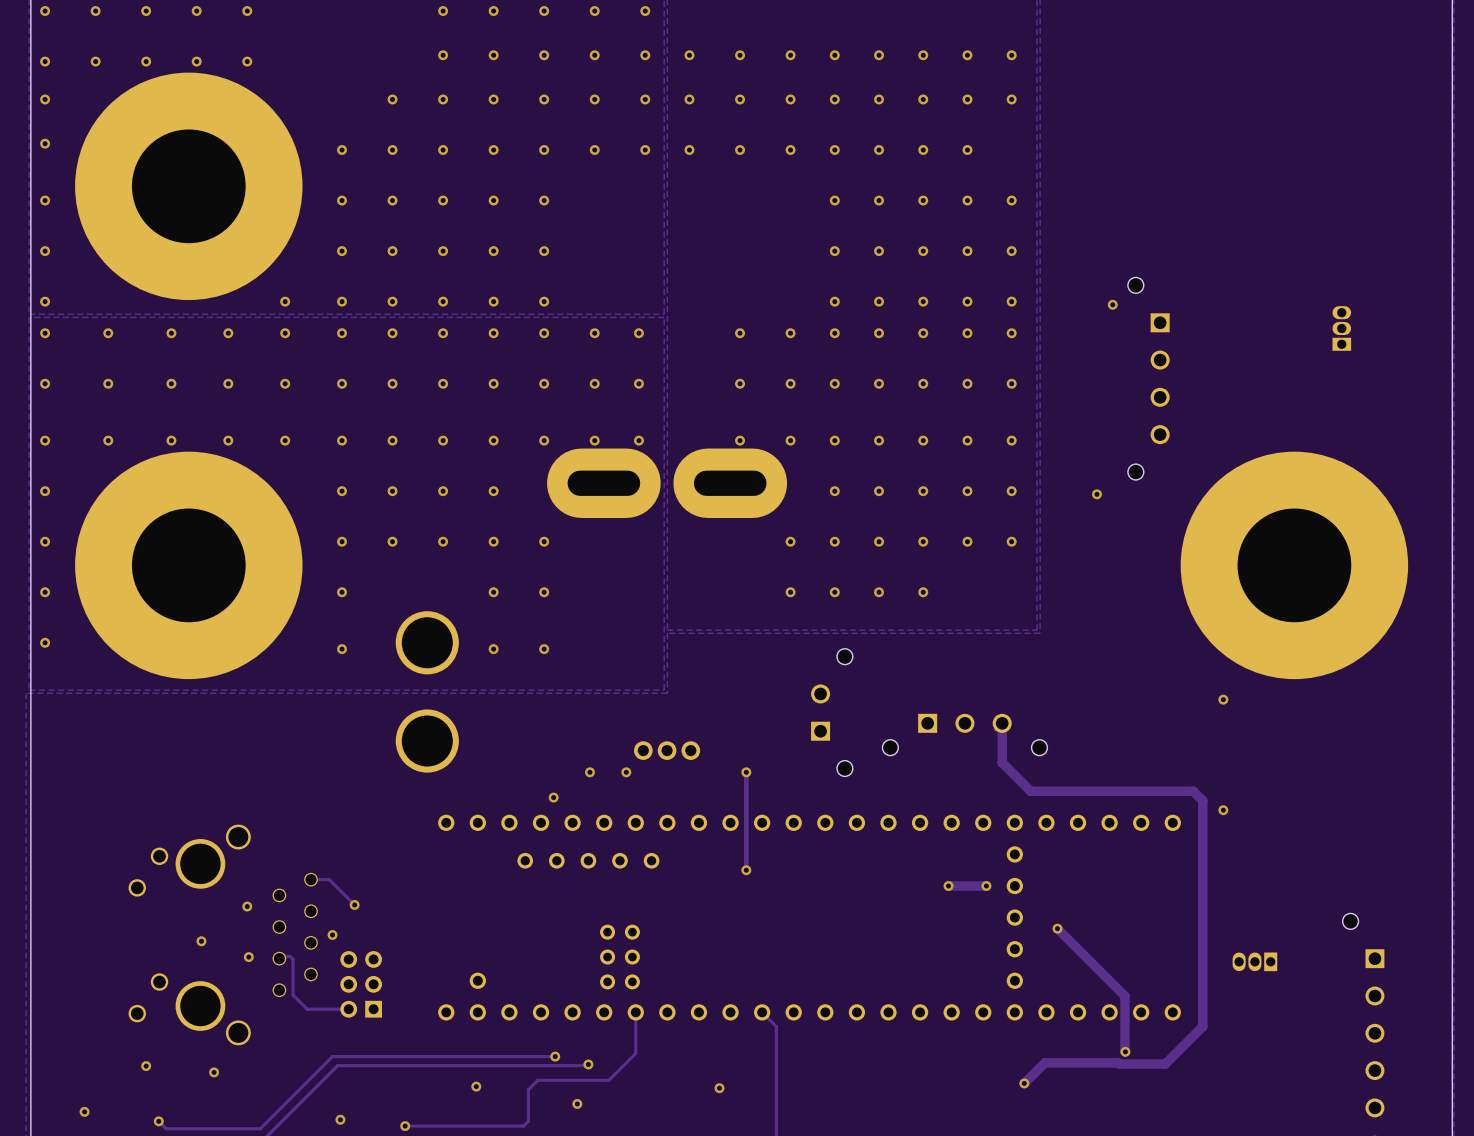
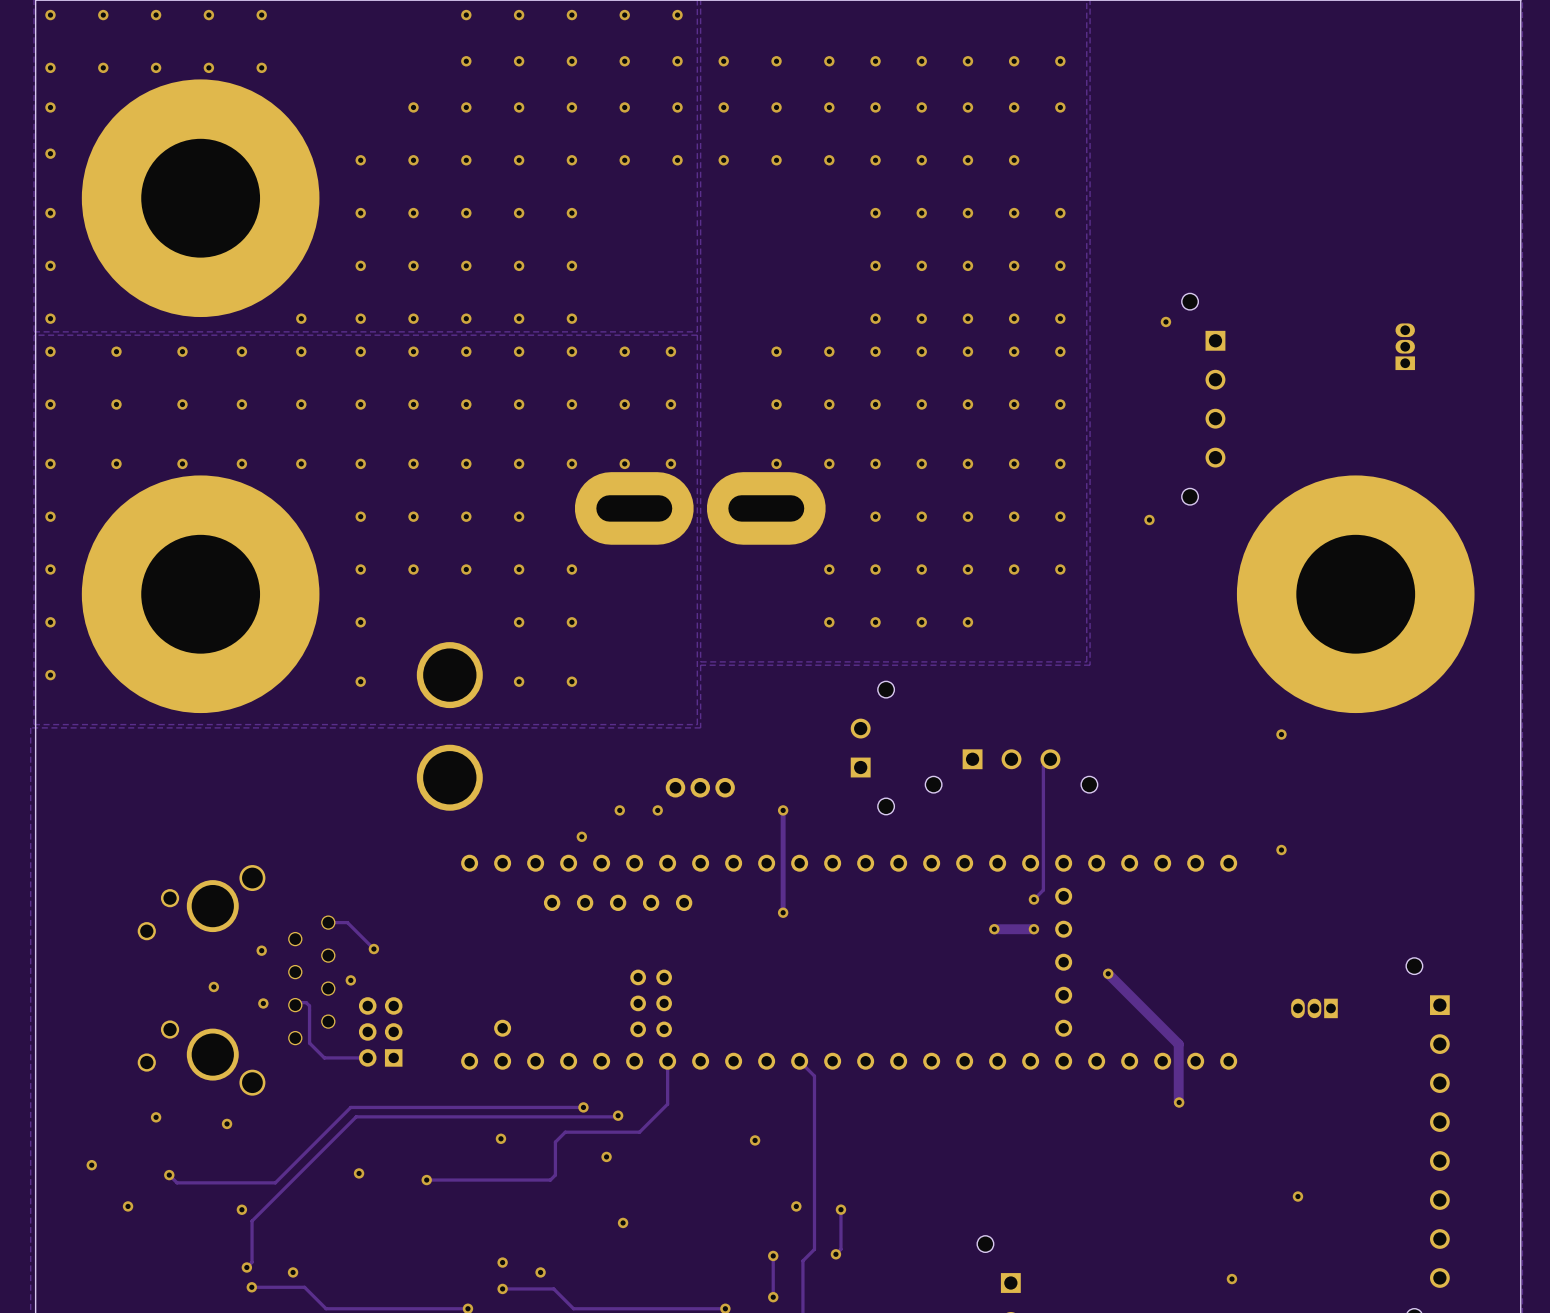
track: (1002, 723) (1002, 762) (1030, 791) (1193, 791) (1202, 800) (1202, 1026) (1165, 1064) (1044, 1062) (1024, 1083) -> none
track: none -> (1043, 766) (1043, 890) (1033, 899)
via: none -> (1033, 899)
via: (1024, 1083) -> none

